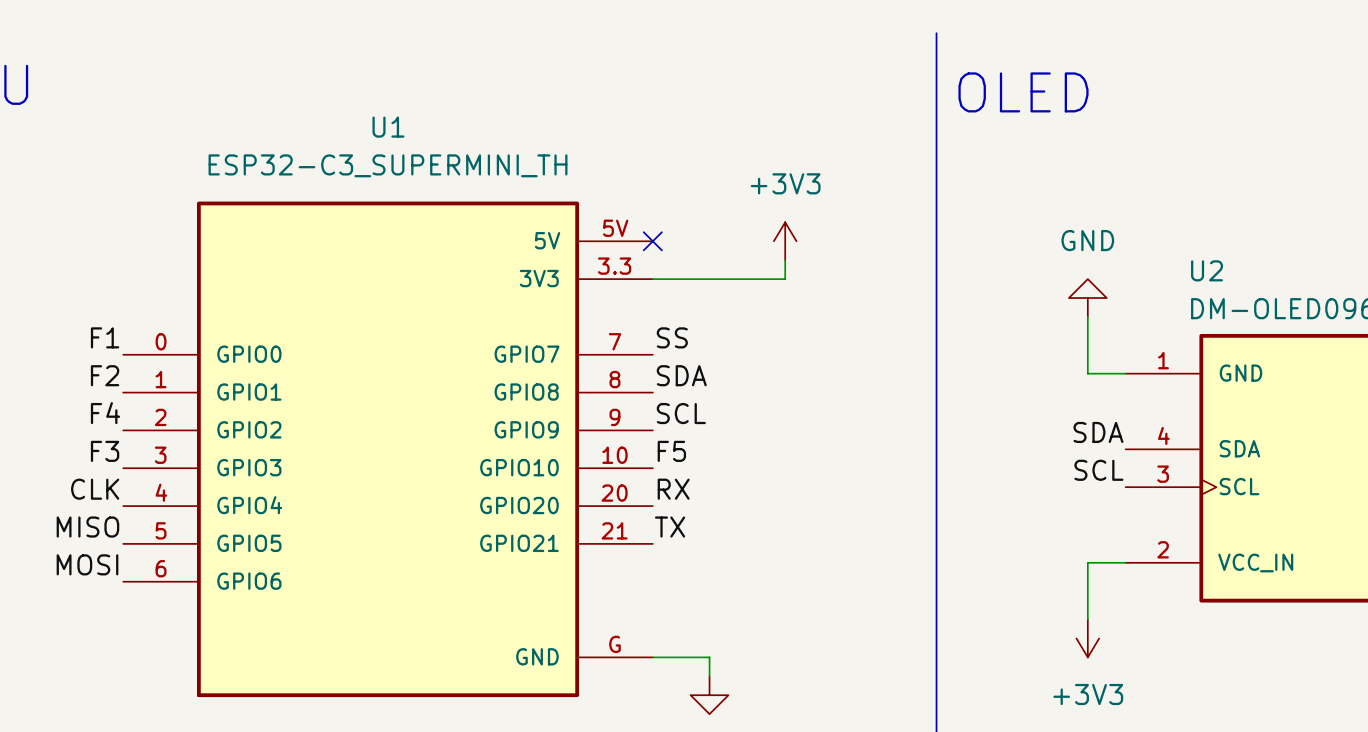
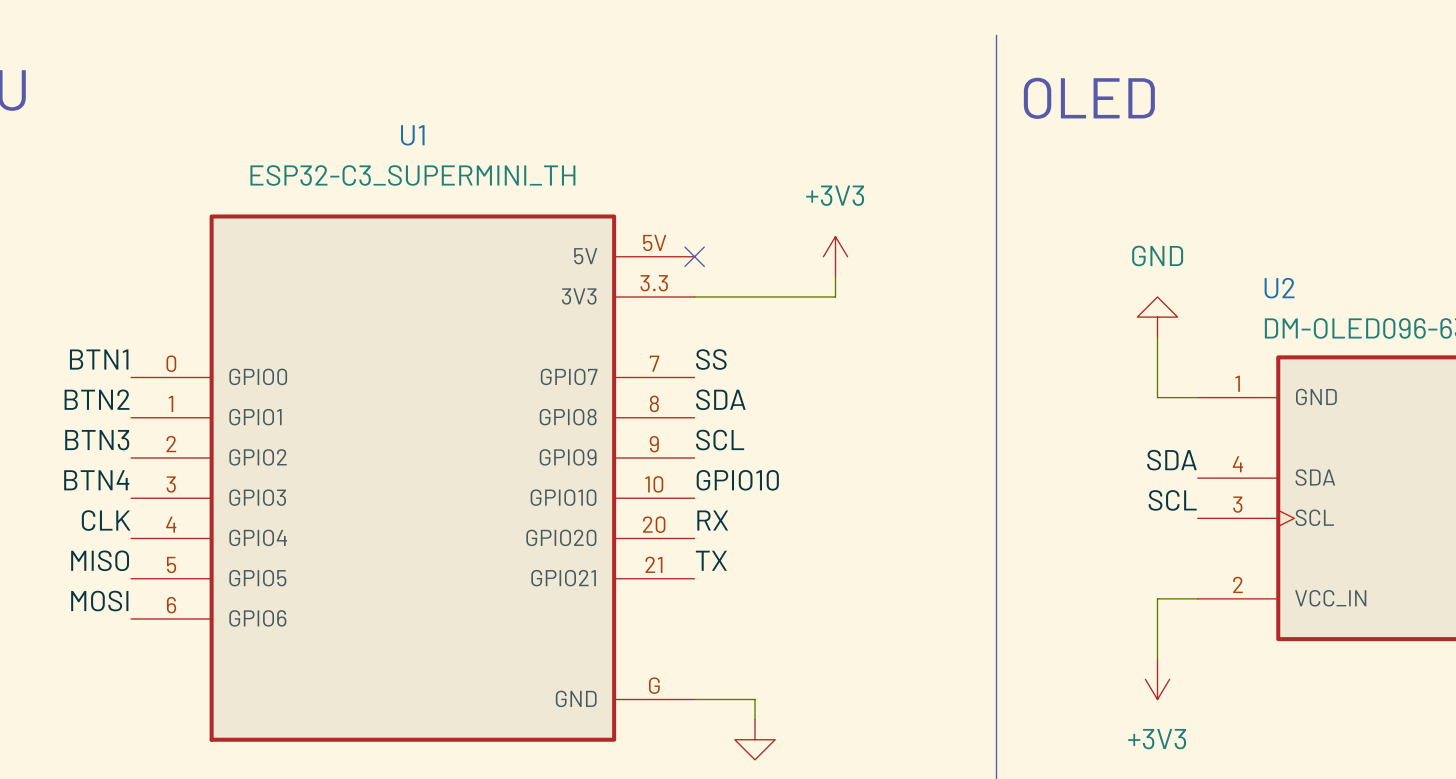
label: F1 (105, 337) -> BTN1 (99, 359)
label: F2 (105, 375) -> BTN2 (97, 399)
label: F4 (105, 413) -> BTN3 (97, 440)
label: F3 (105, 451) -> BTN4 (96, 480)
label: F5 (671, 451) -> GPIO10 (737, 480)

